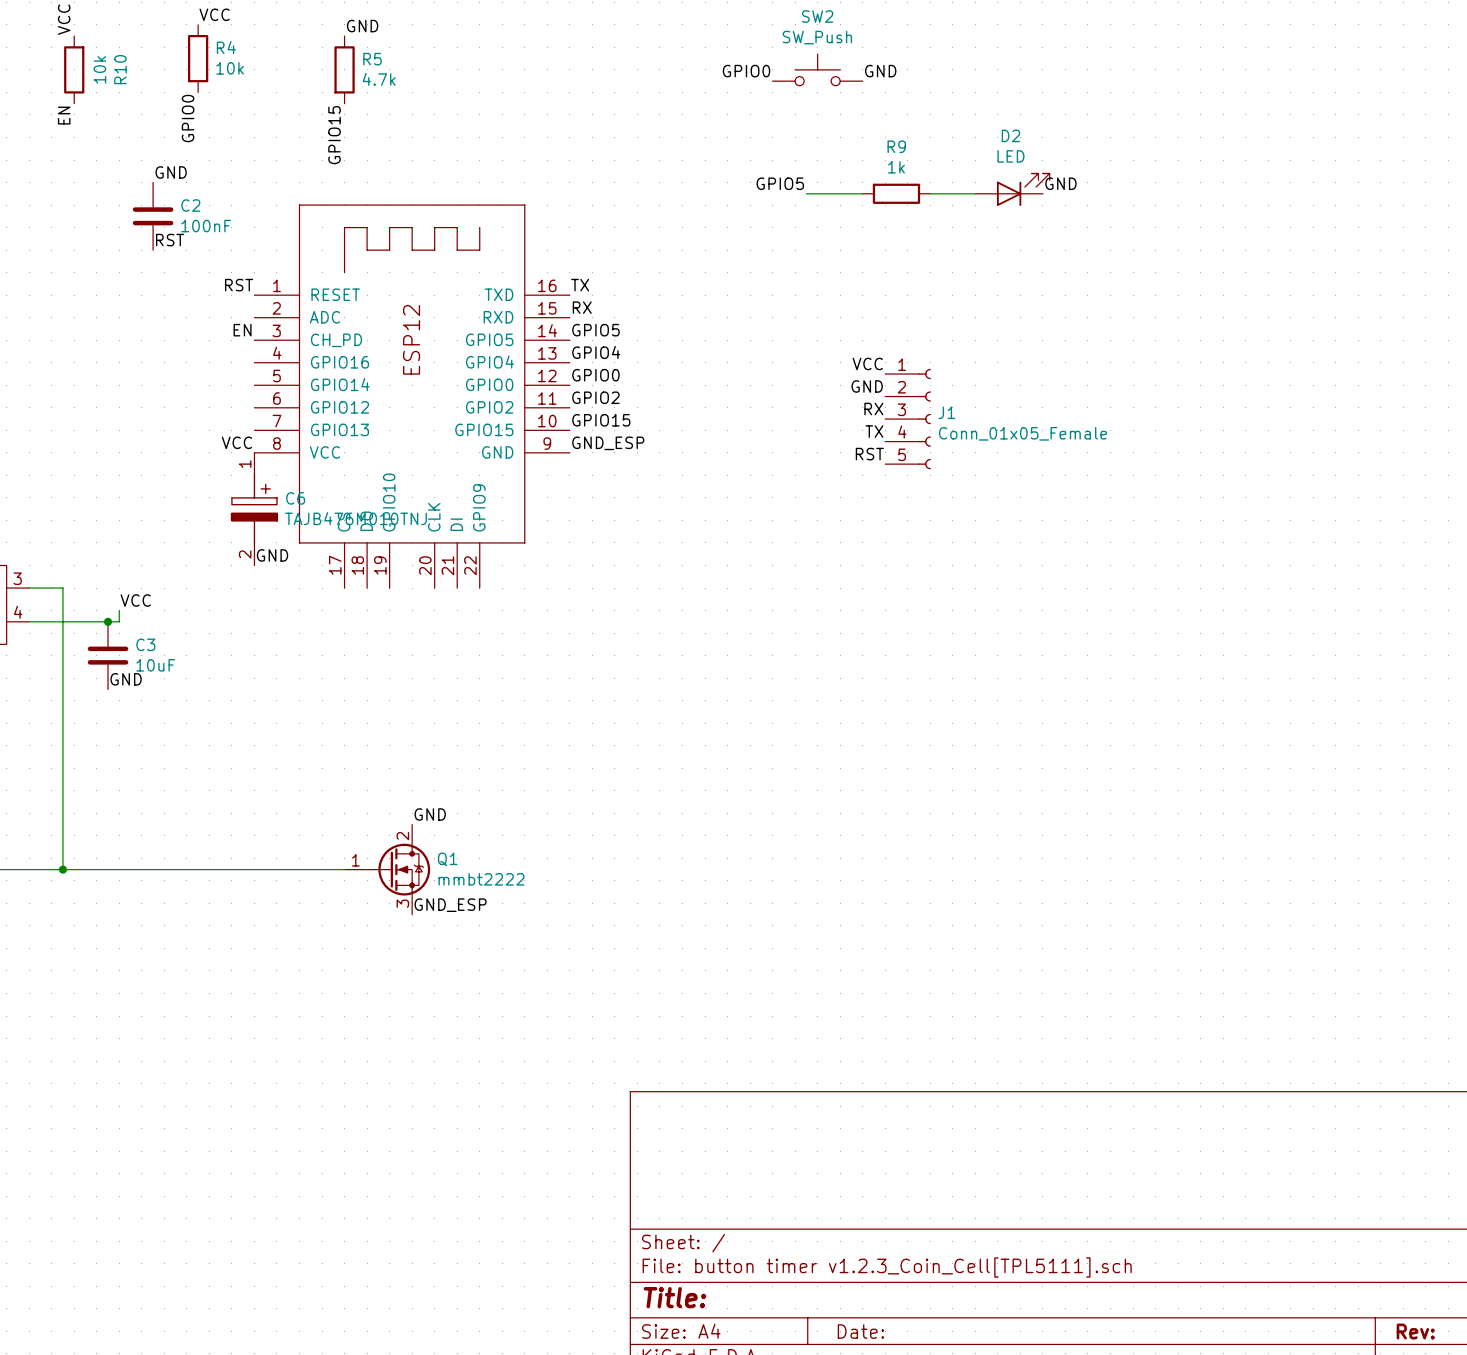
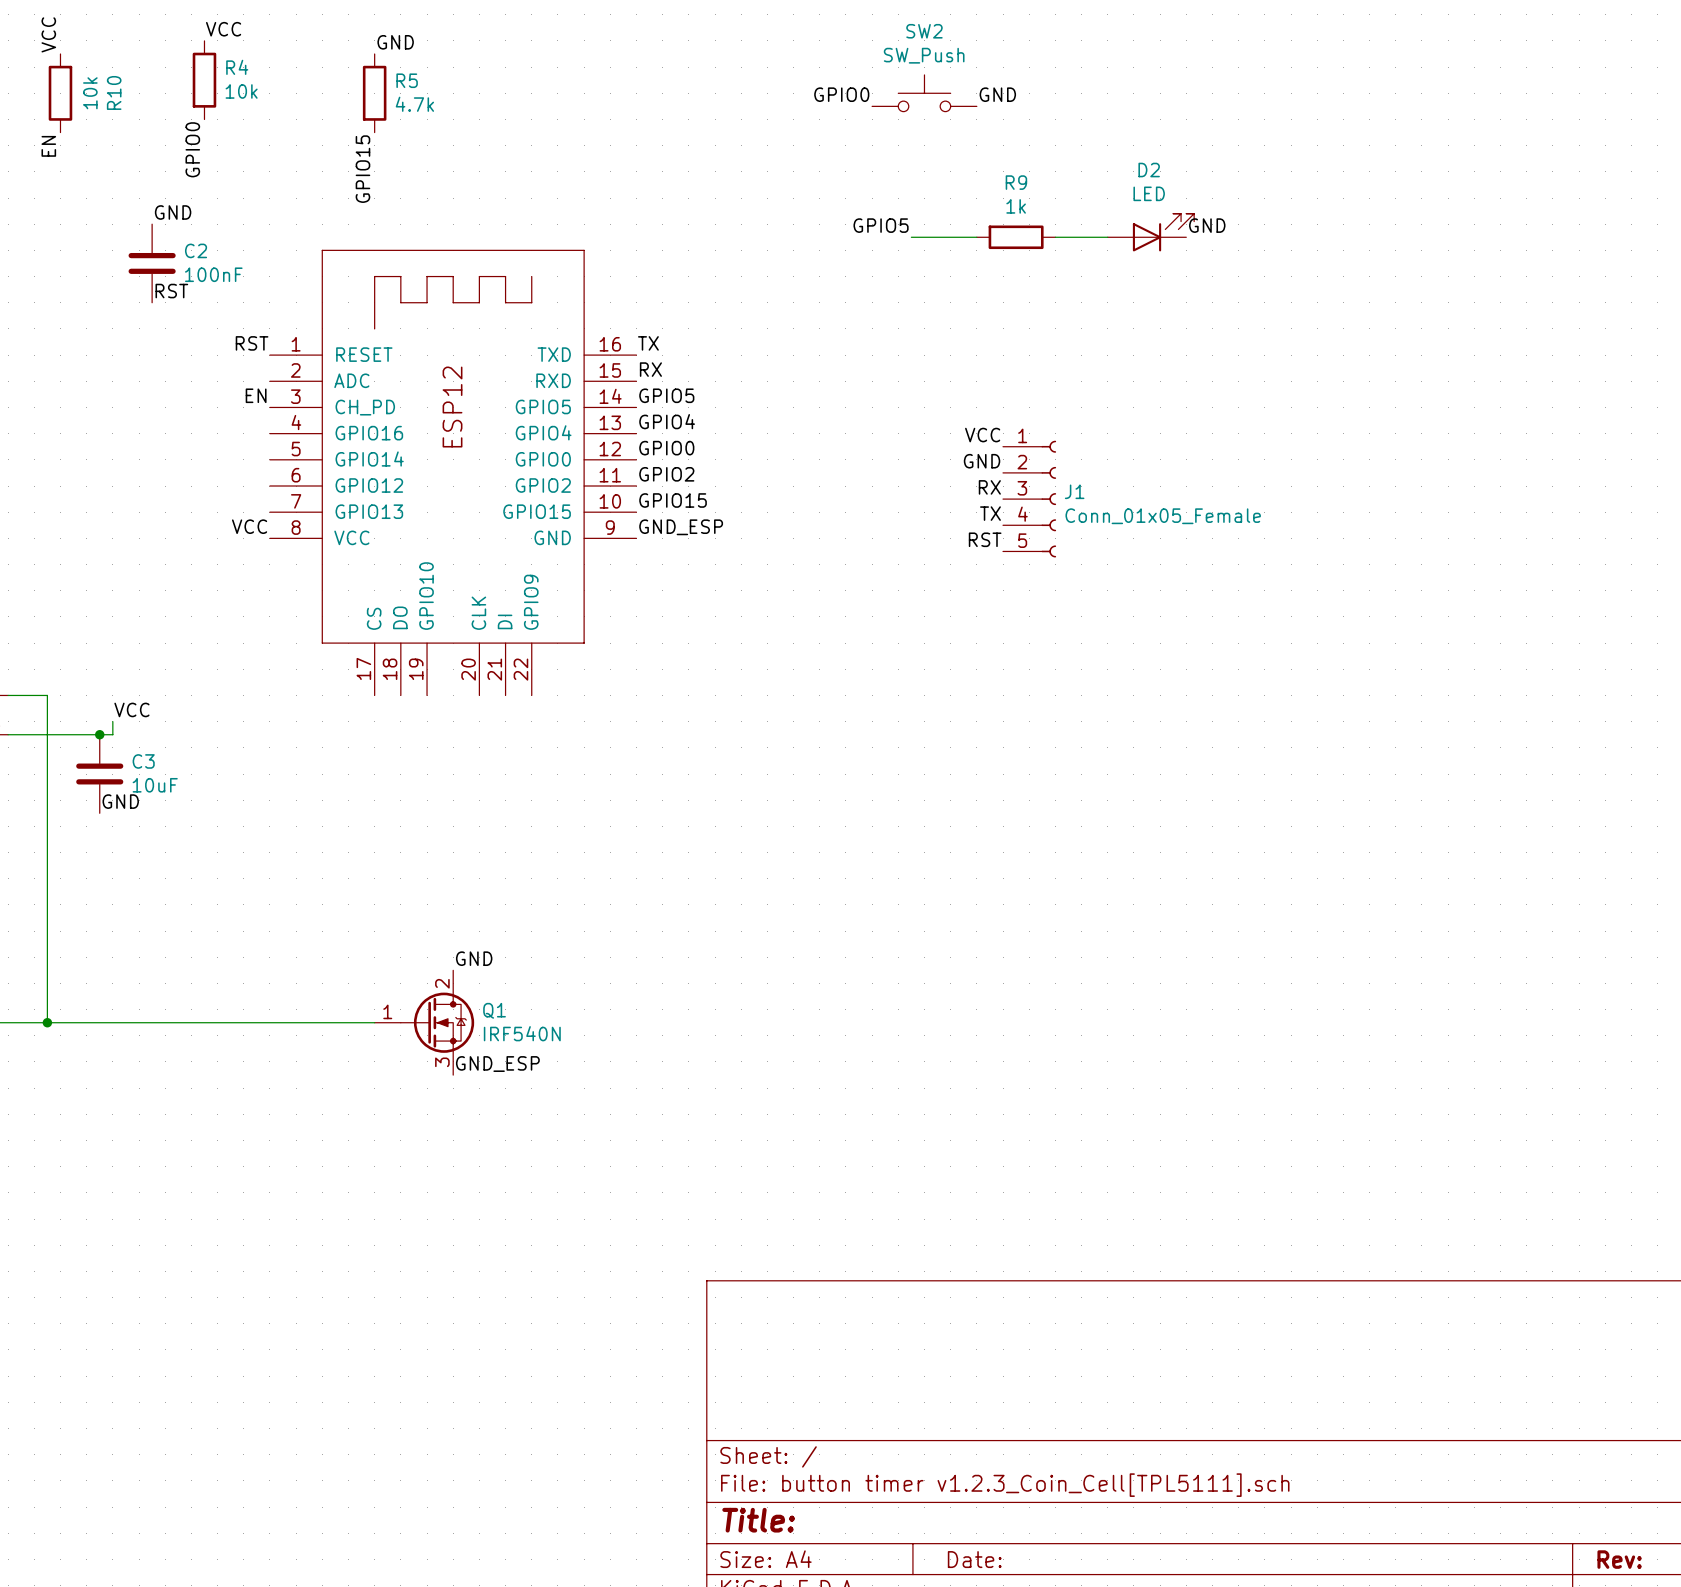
C6: TAJB476M010TNJ (254, 509) -> none
label: GND (272, 555) -> none
Q1 value: mmbt2222 (481, 879) -> IRF540N (522, 1033)

